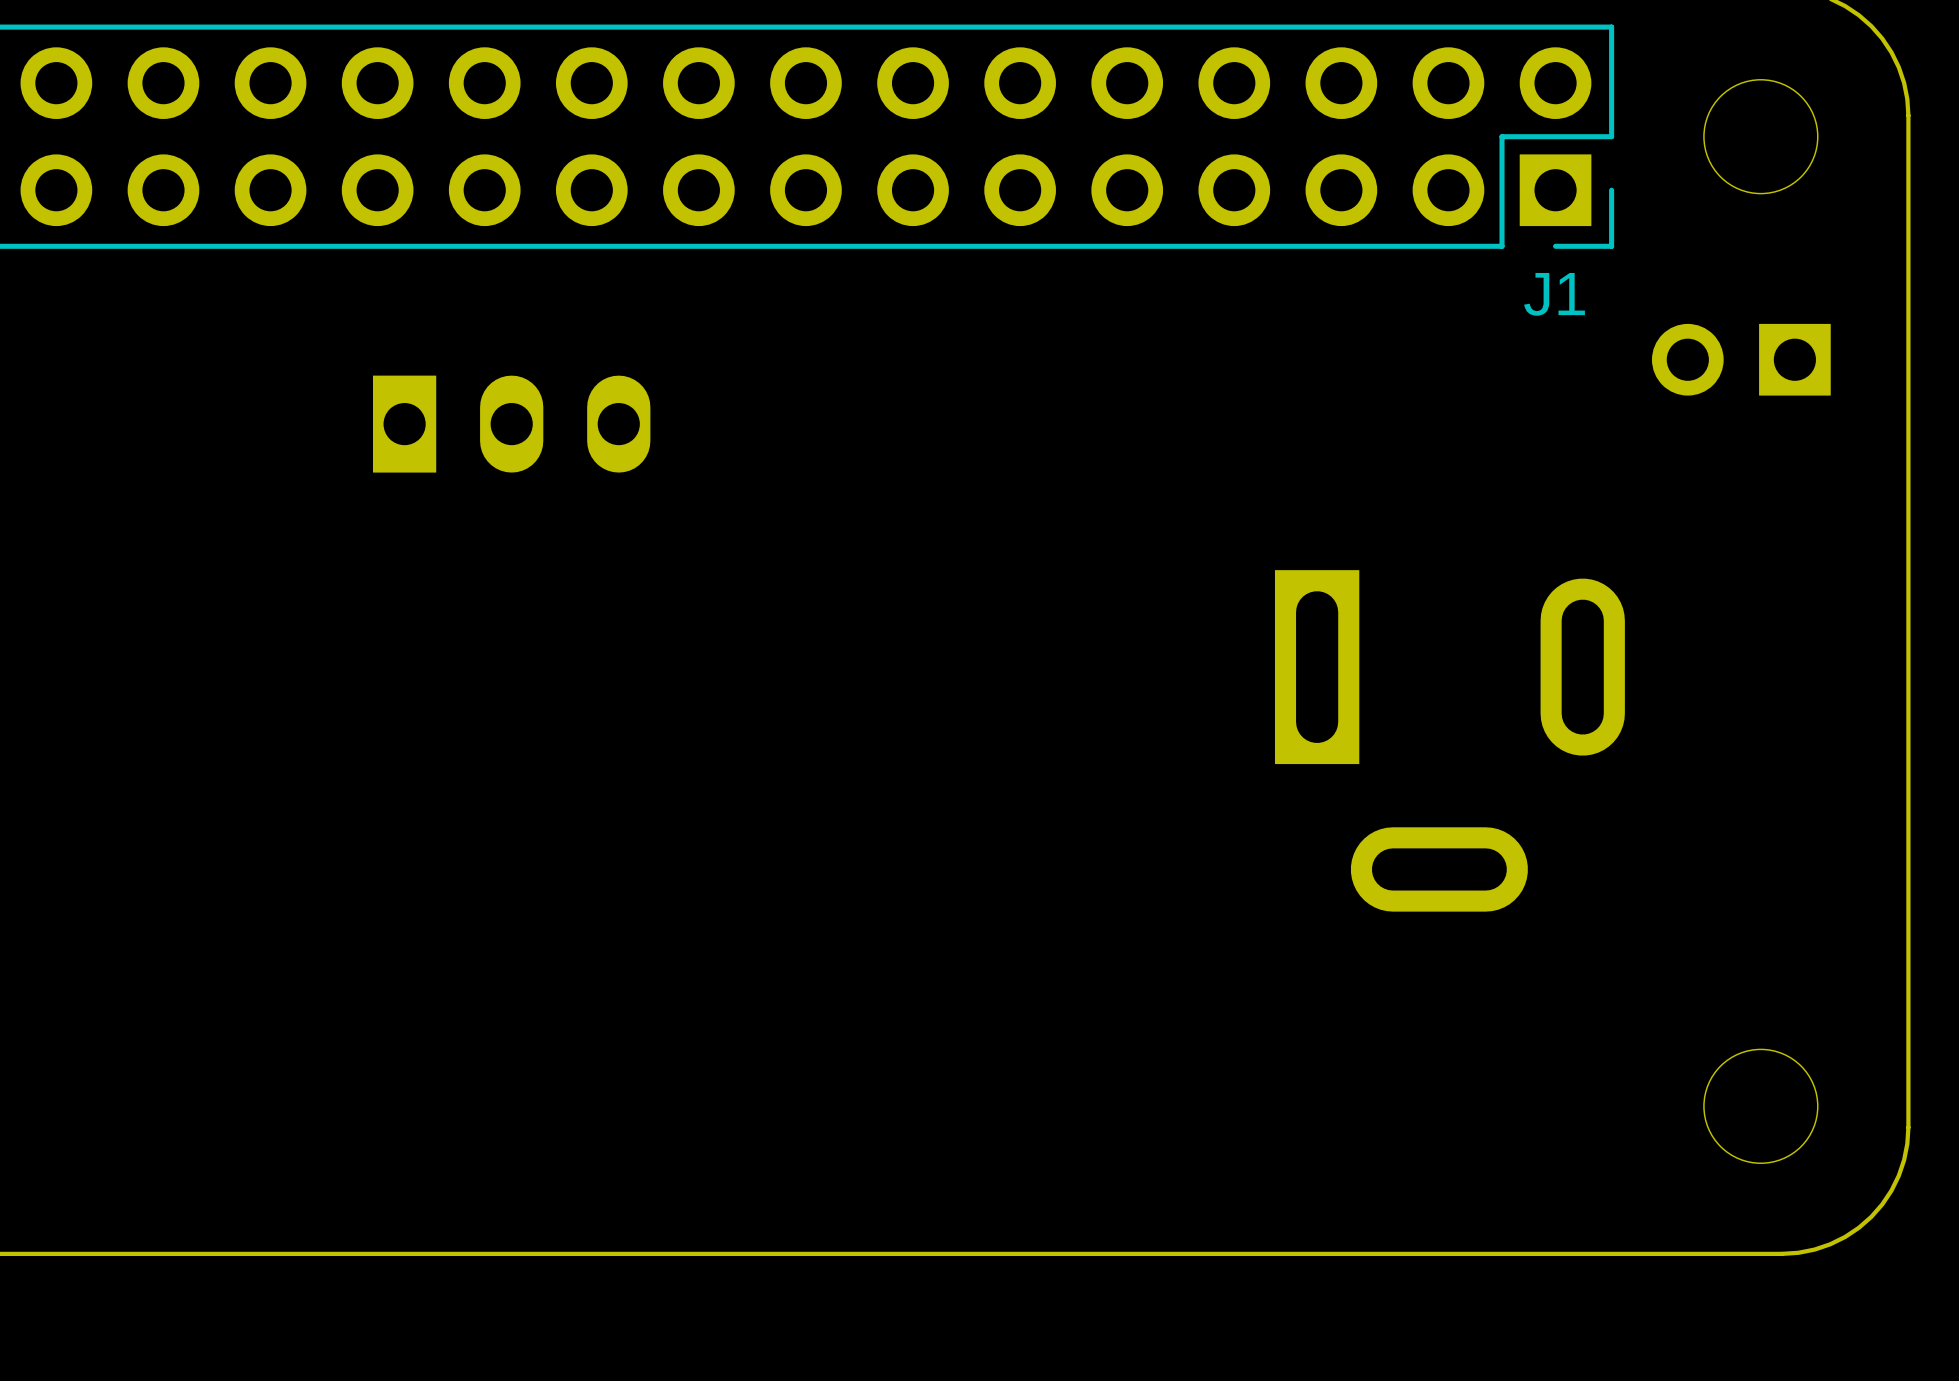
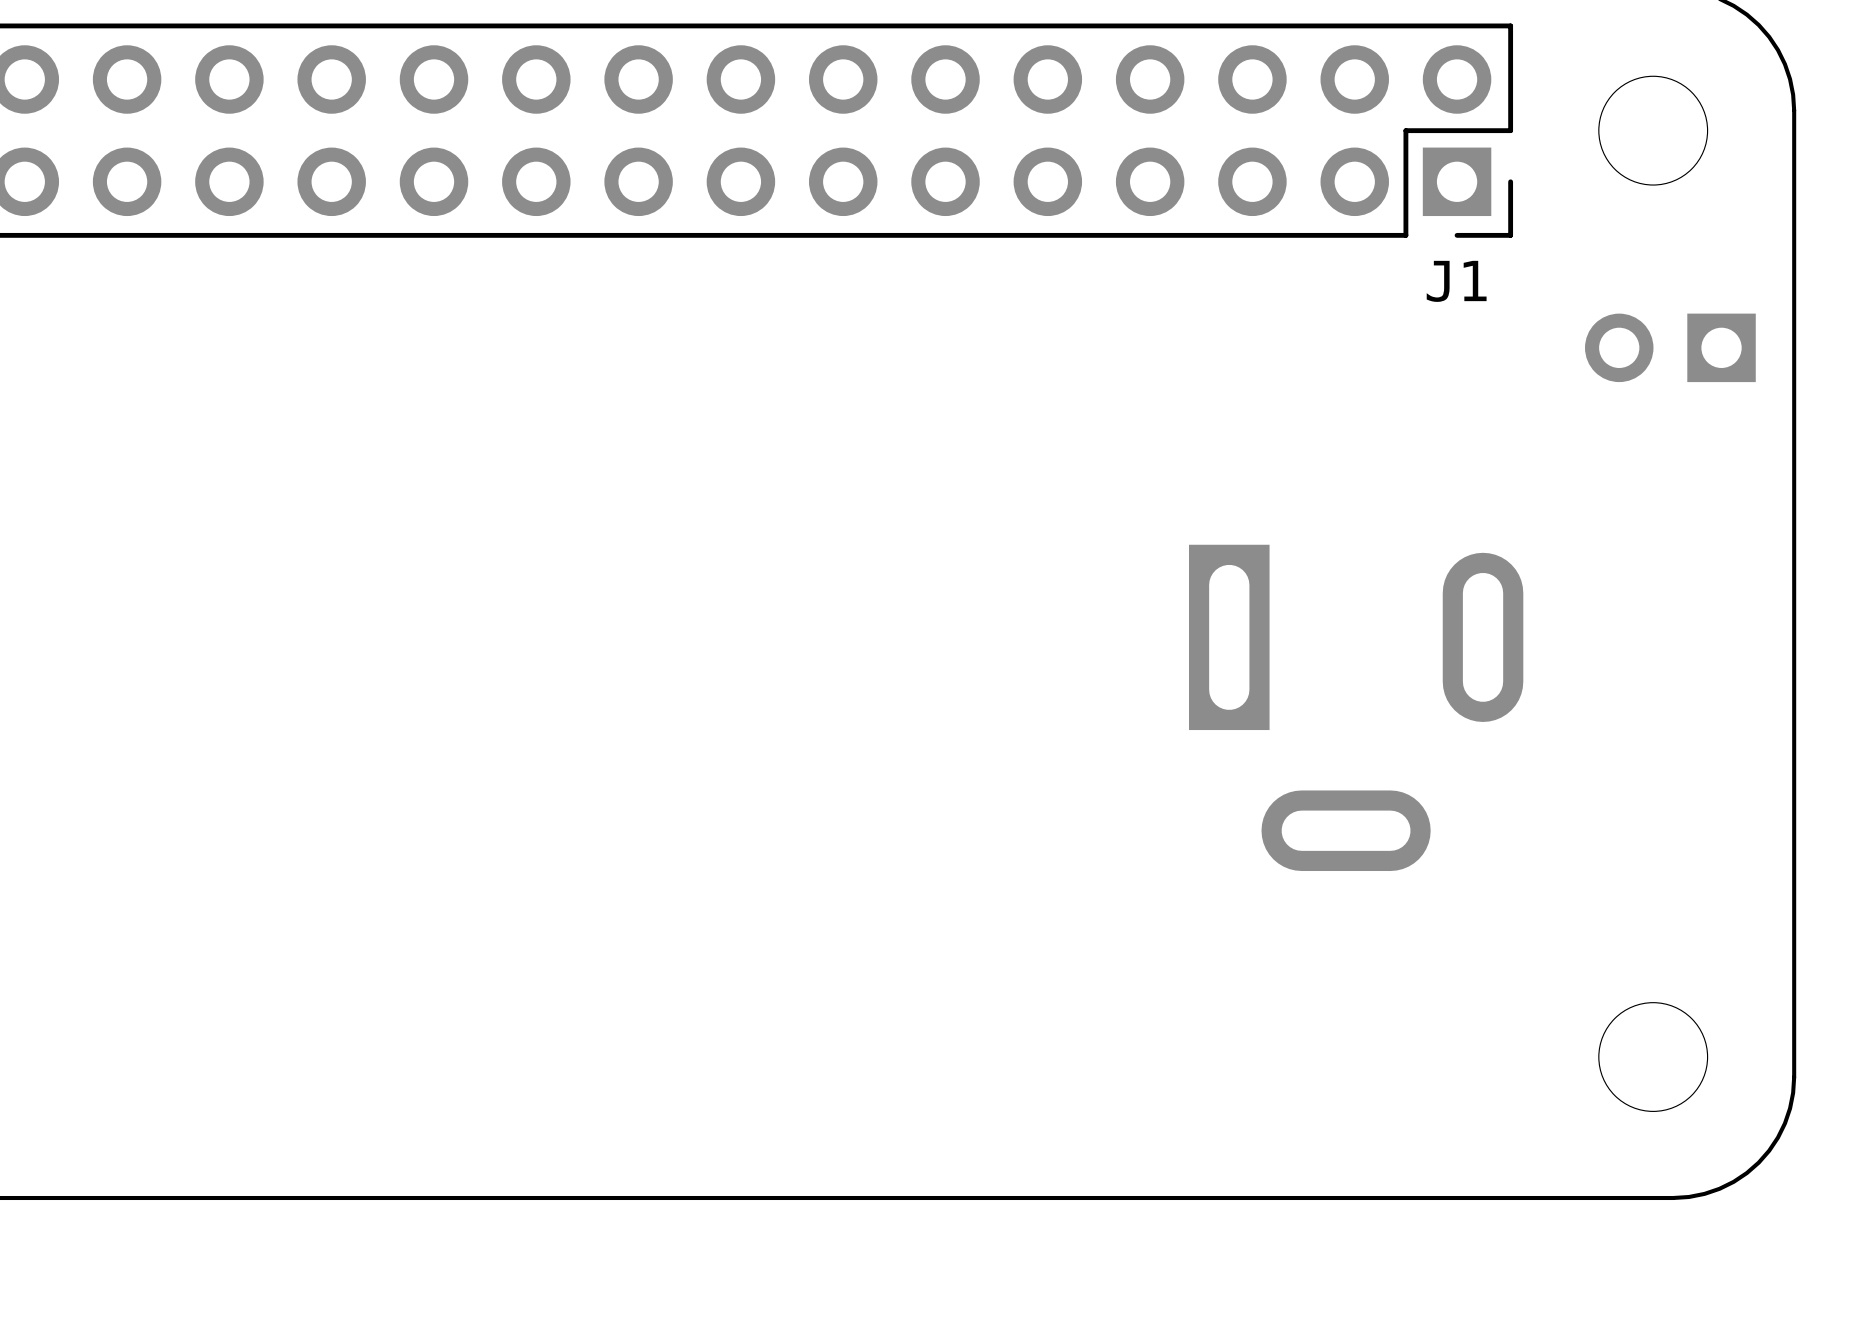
part position: (1741, 359) -> (1670, 347)
part: (511, 424) -> none

